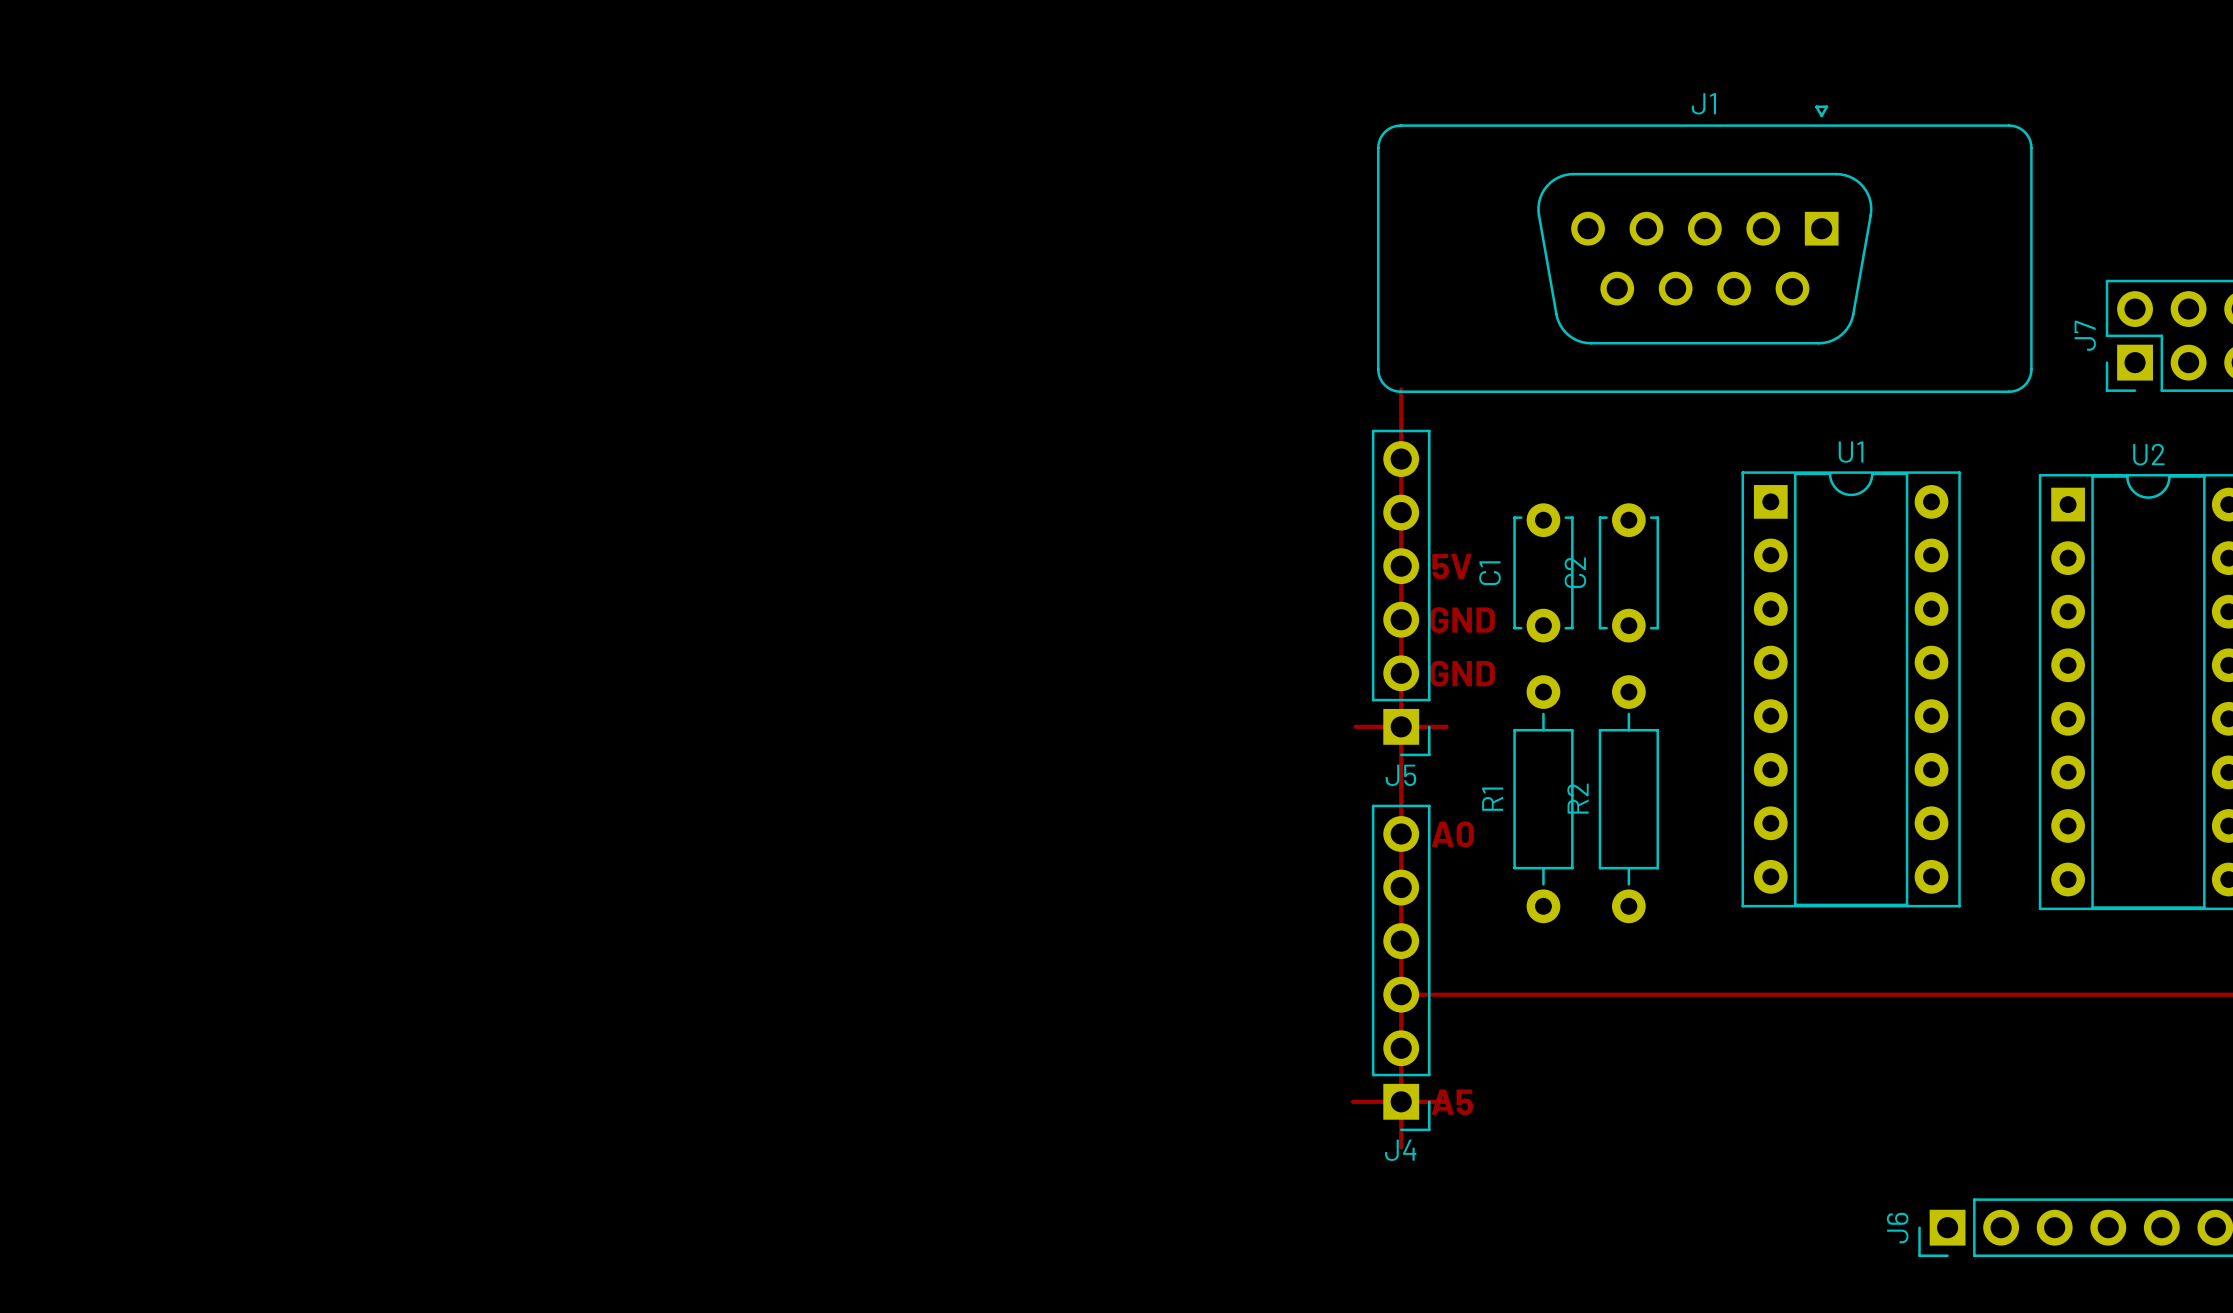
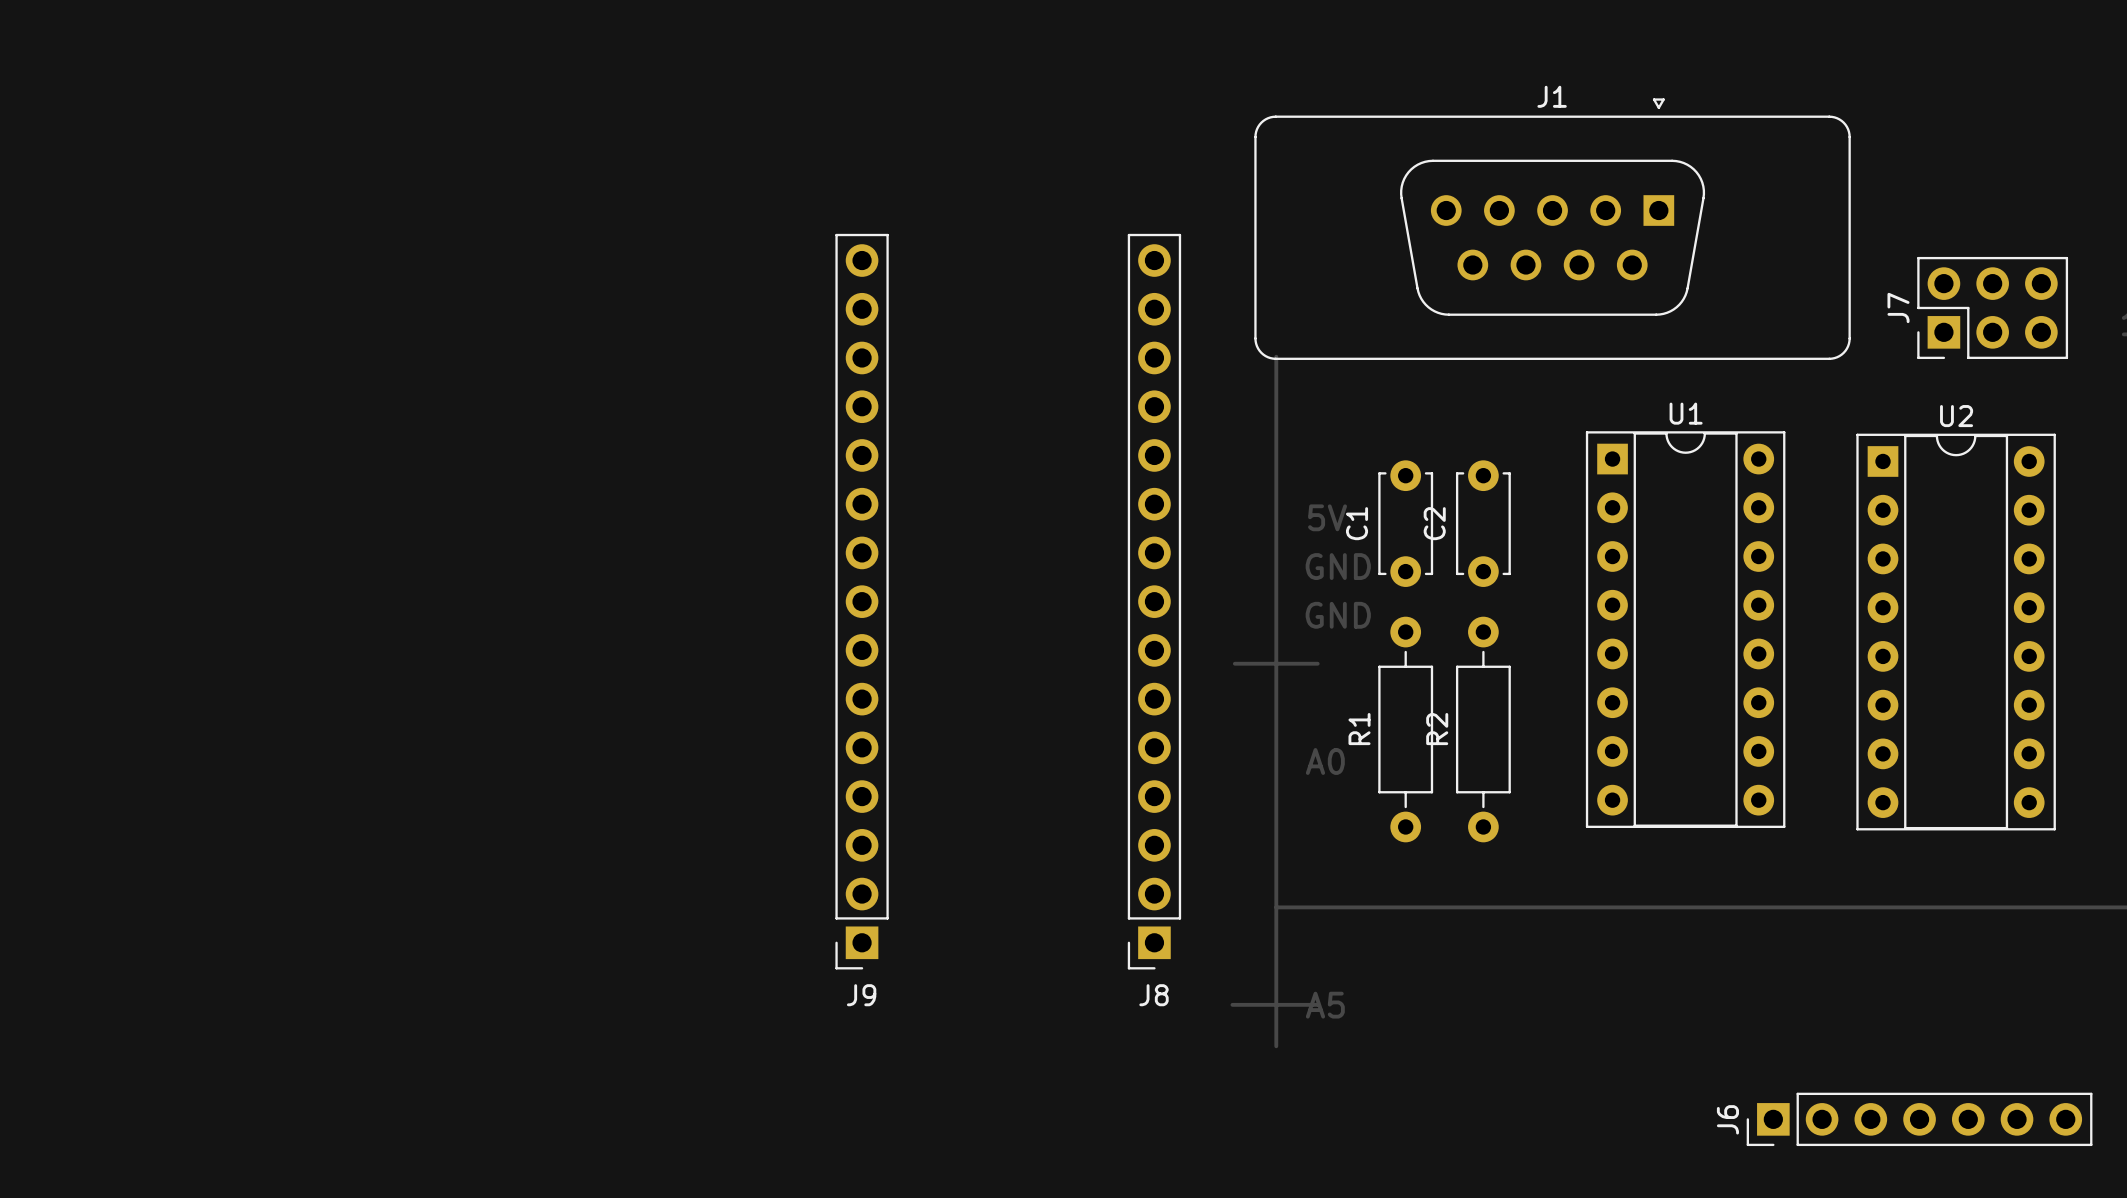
J5: (1401, 592) -> none
J9: none -> (862, 601)
J8: none -> (1154, 601)
J4: (1401, 967) -> none

